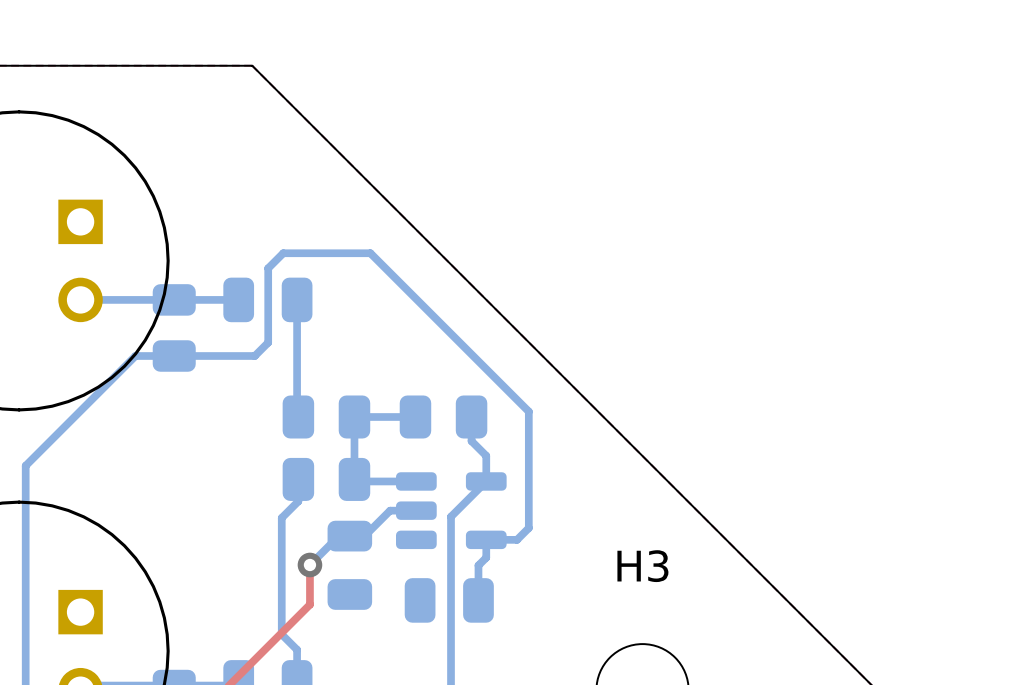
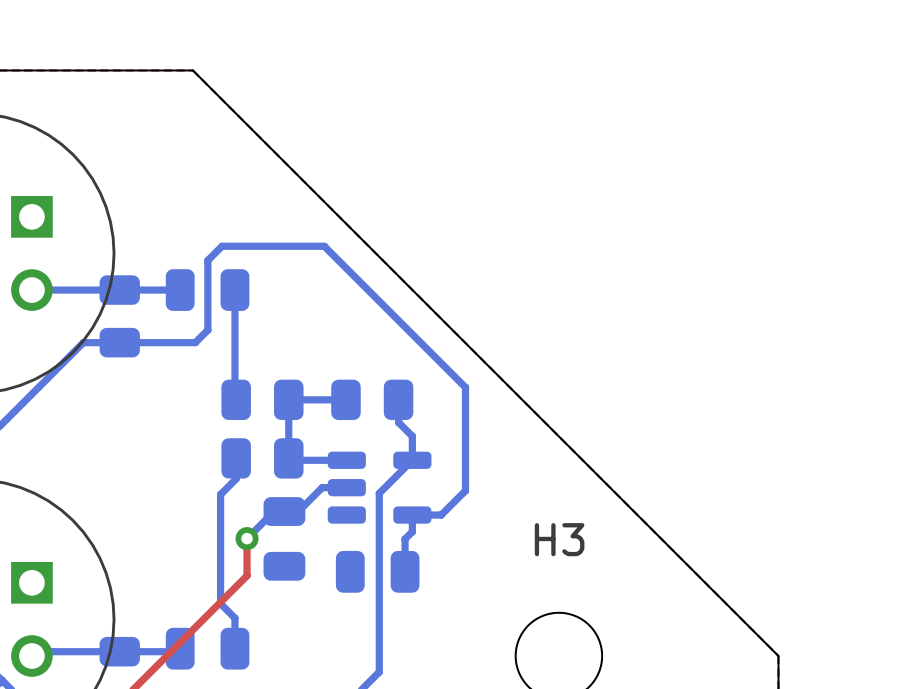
bottom track: (370, 253) (528, 411) (528, 528) -> (303, 246) (324, 246) (465, 387) (465, 490) (452, 503)

